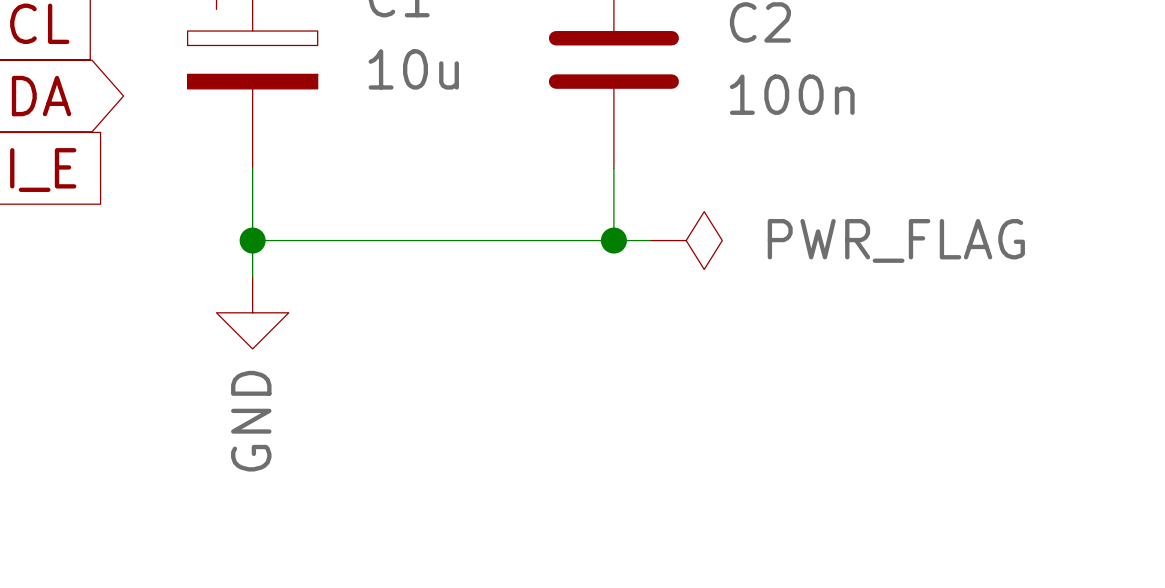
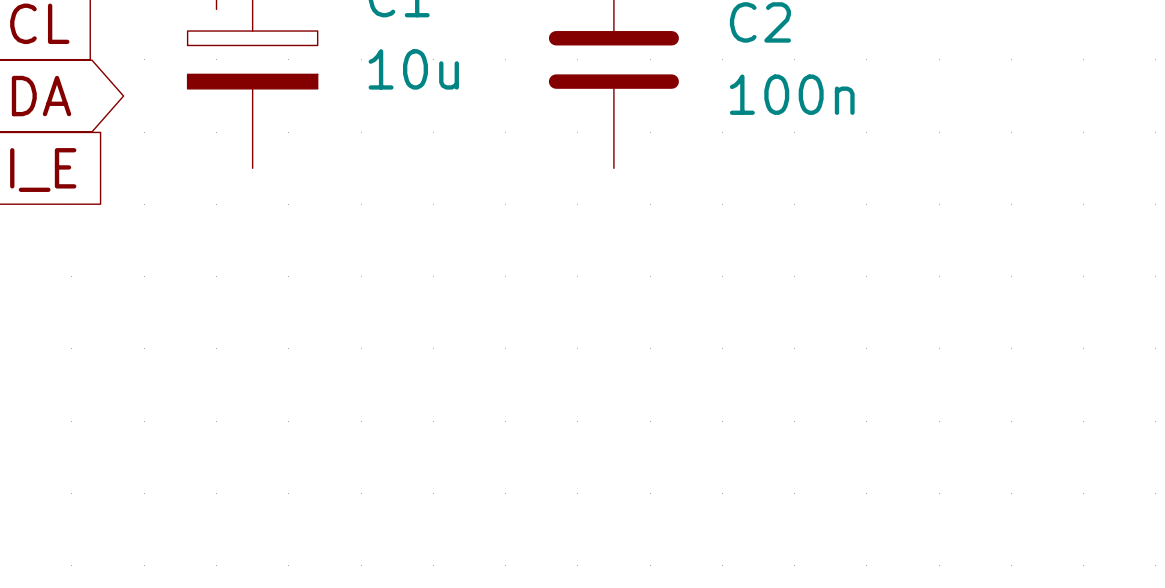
wire: (252, 168) (252, 276) -> none
wire: (613, 168) (613, 240) -> none
wire: (252, 240) (650, 240) -> none
junction: (252, 240) -> none
junction: (613, 240) -> none
power symbol: PWR_FLAG (686, 240) -> none
power symbol: GND (252, 312) -> none

